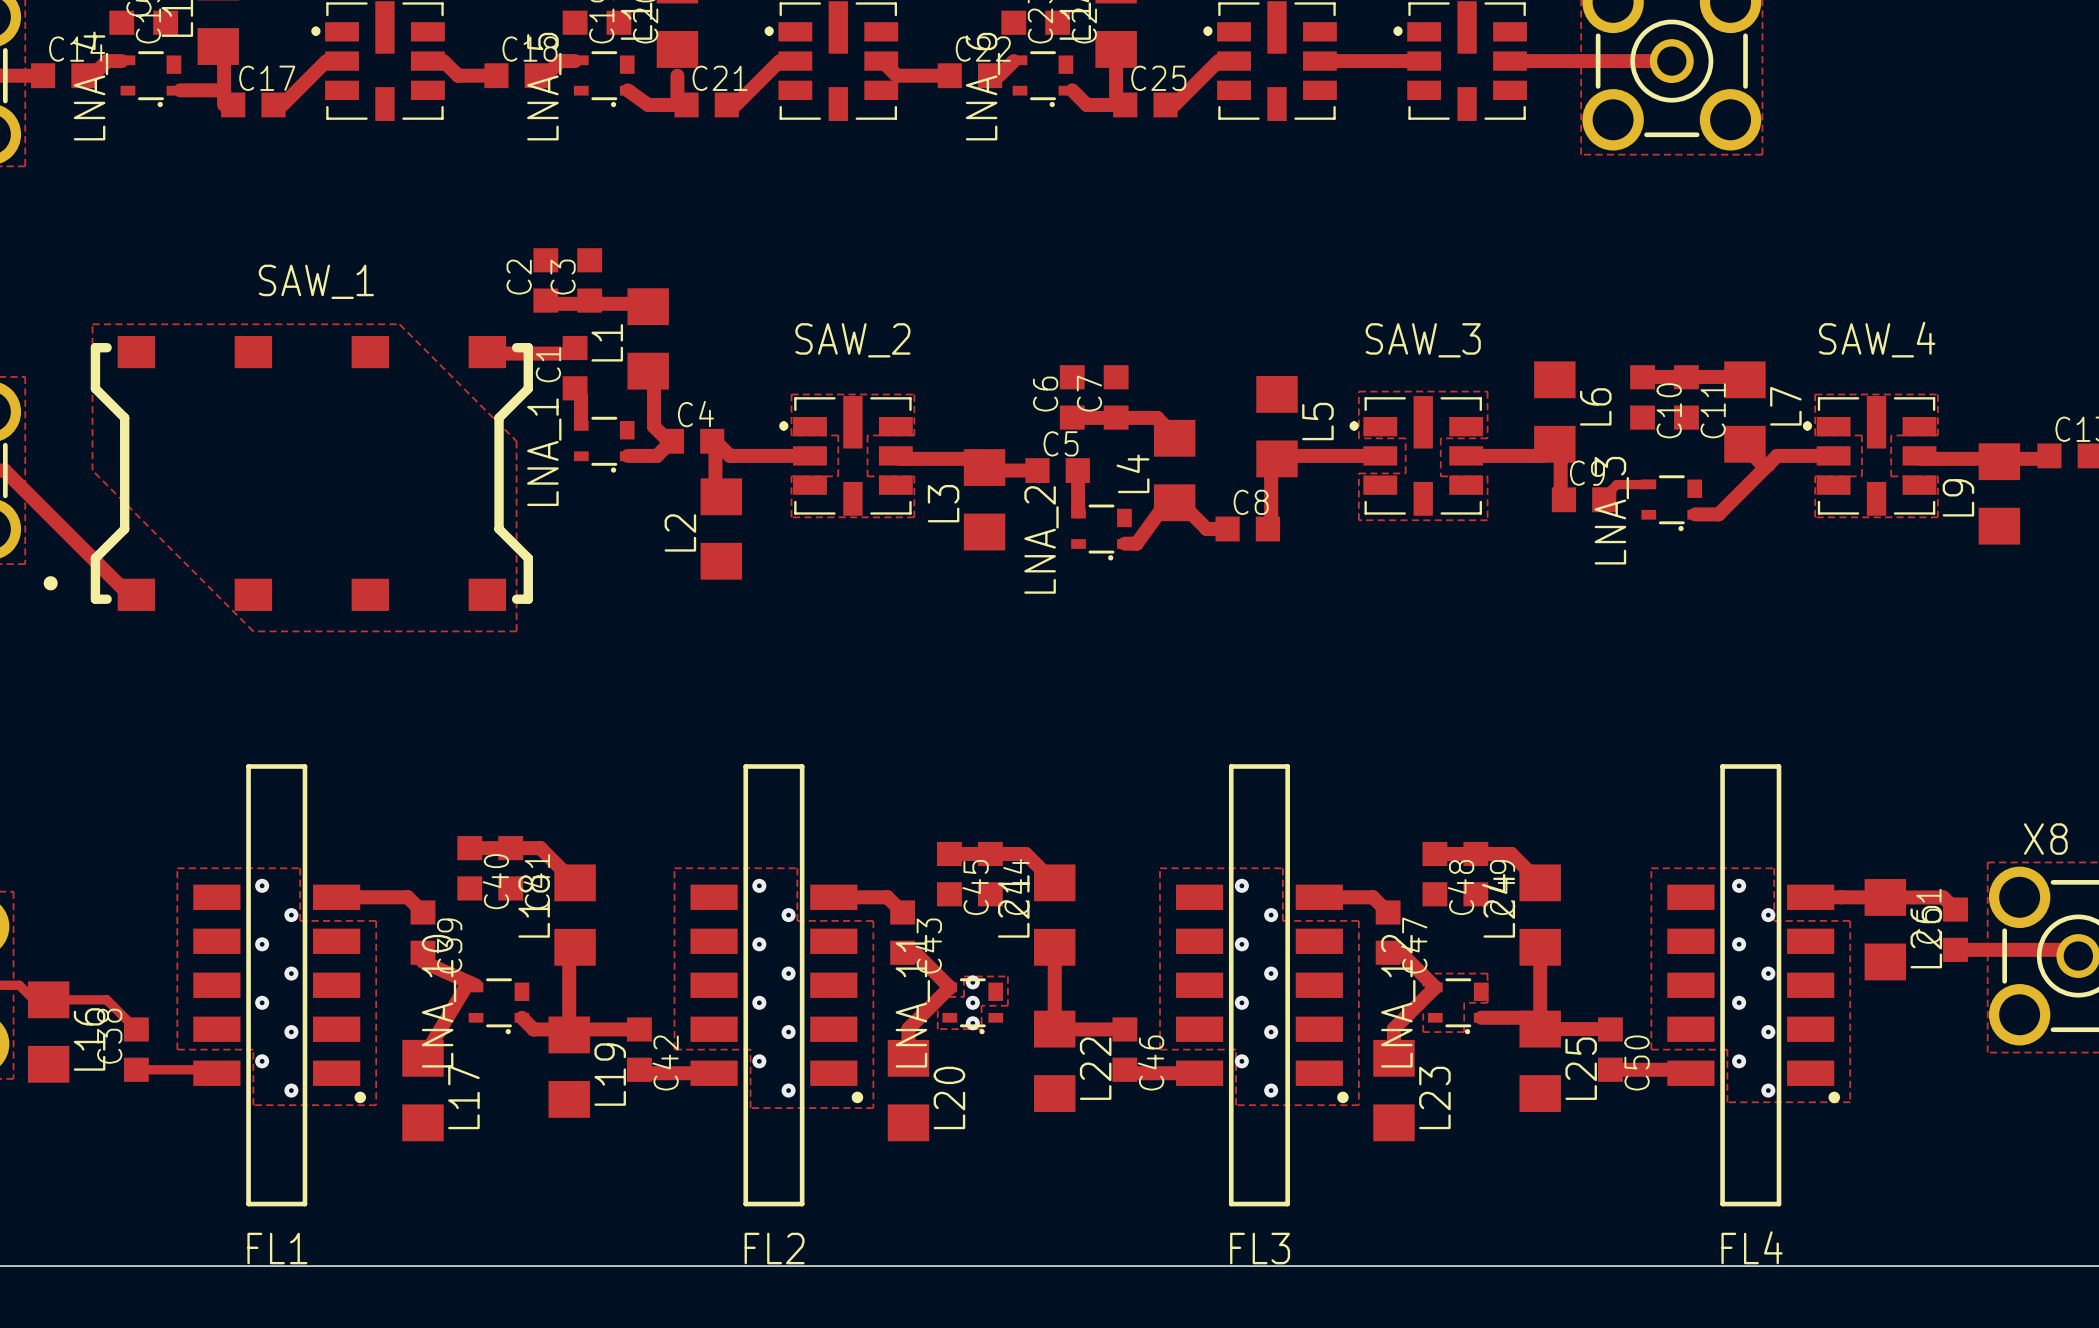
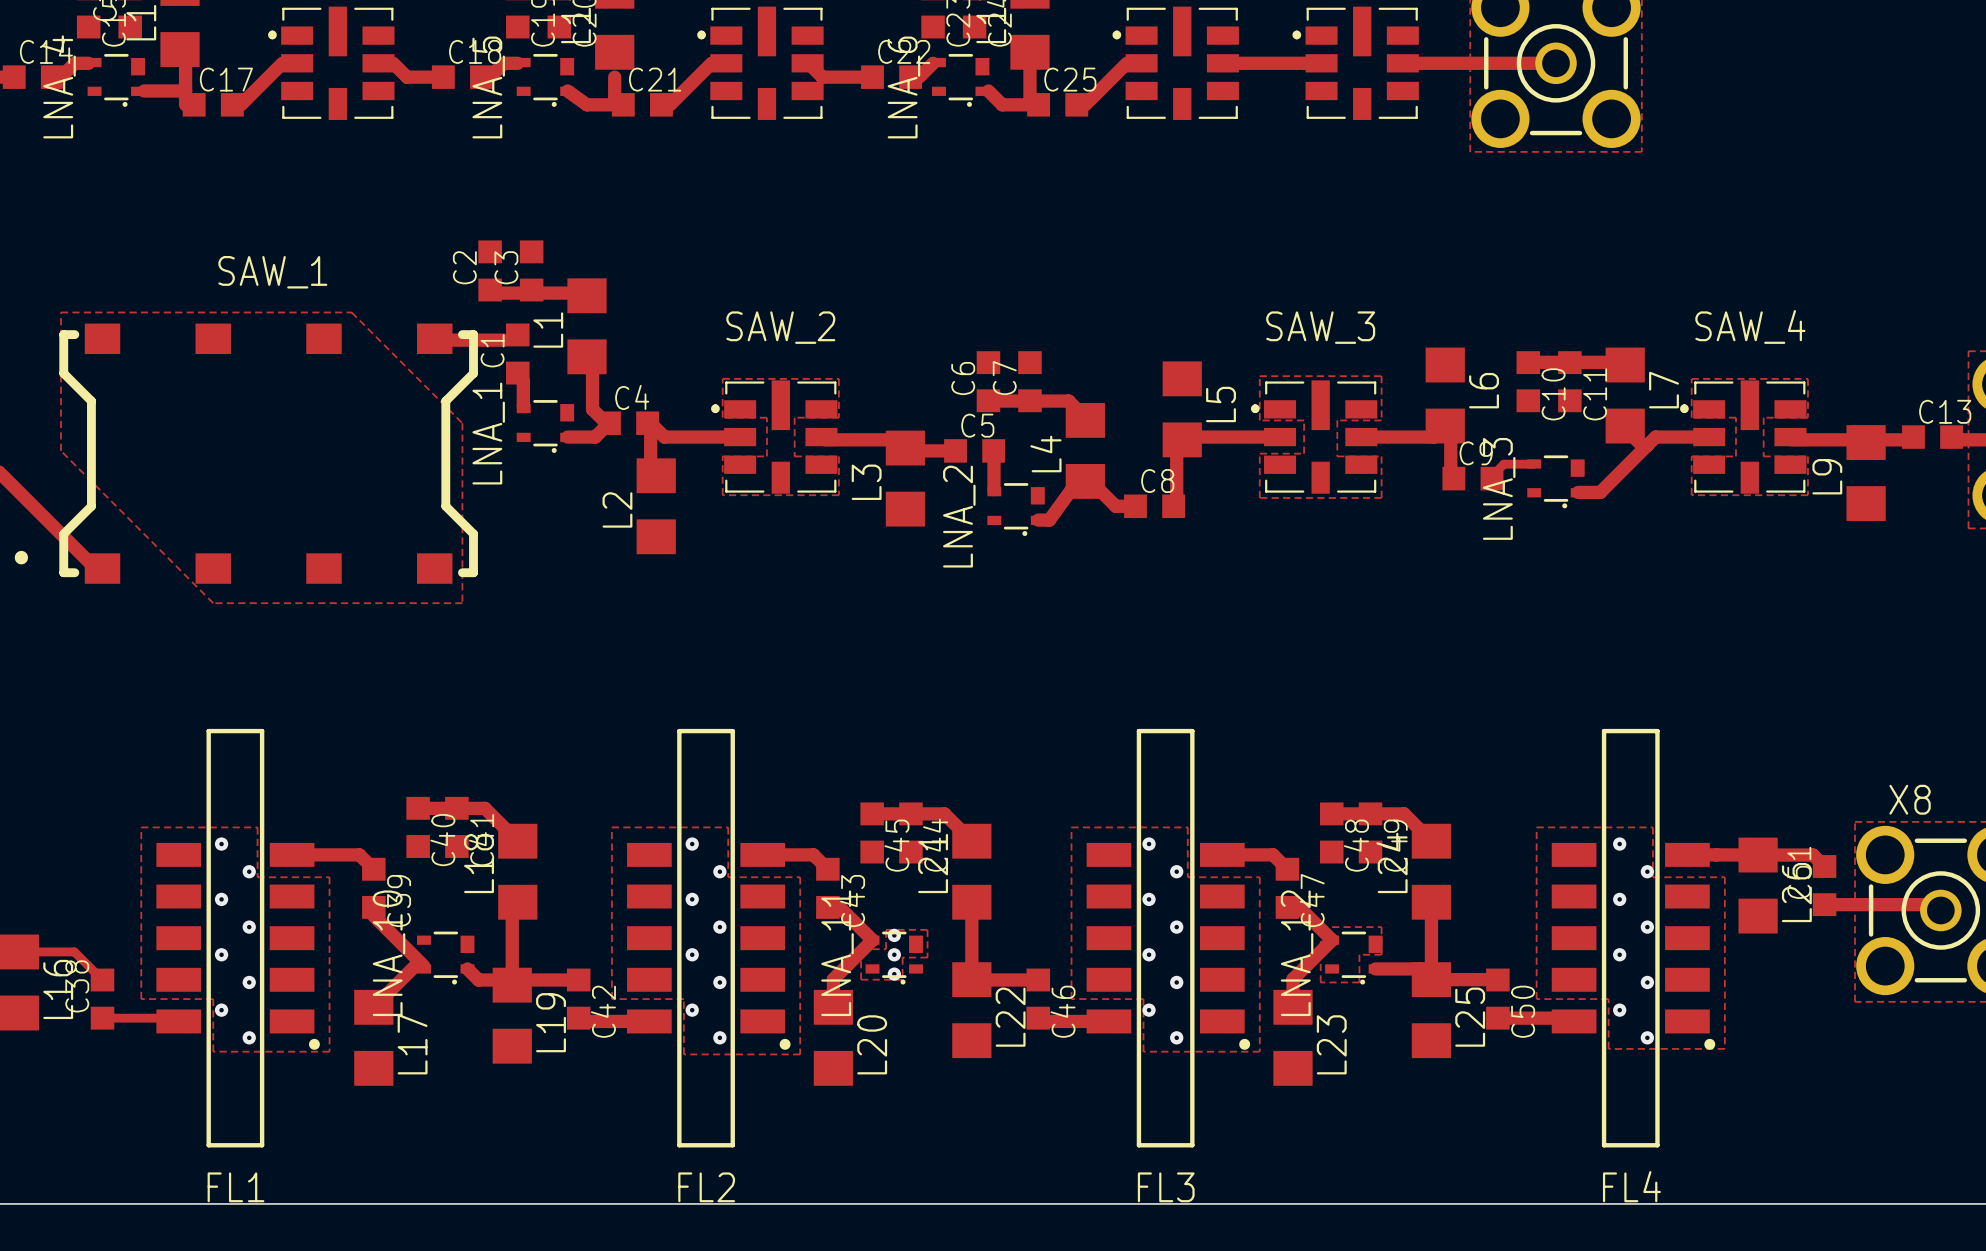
top track: (423, 961) (475, 985) -> none
top track: (466, 985) (423, 1058) -> (373, 916) (423, 965) (415, 965) (373, 1007)

